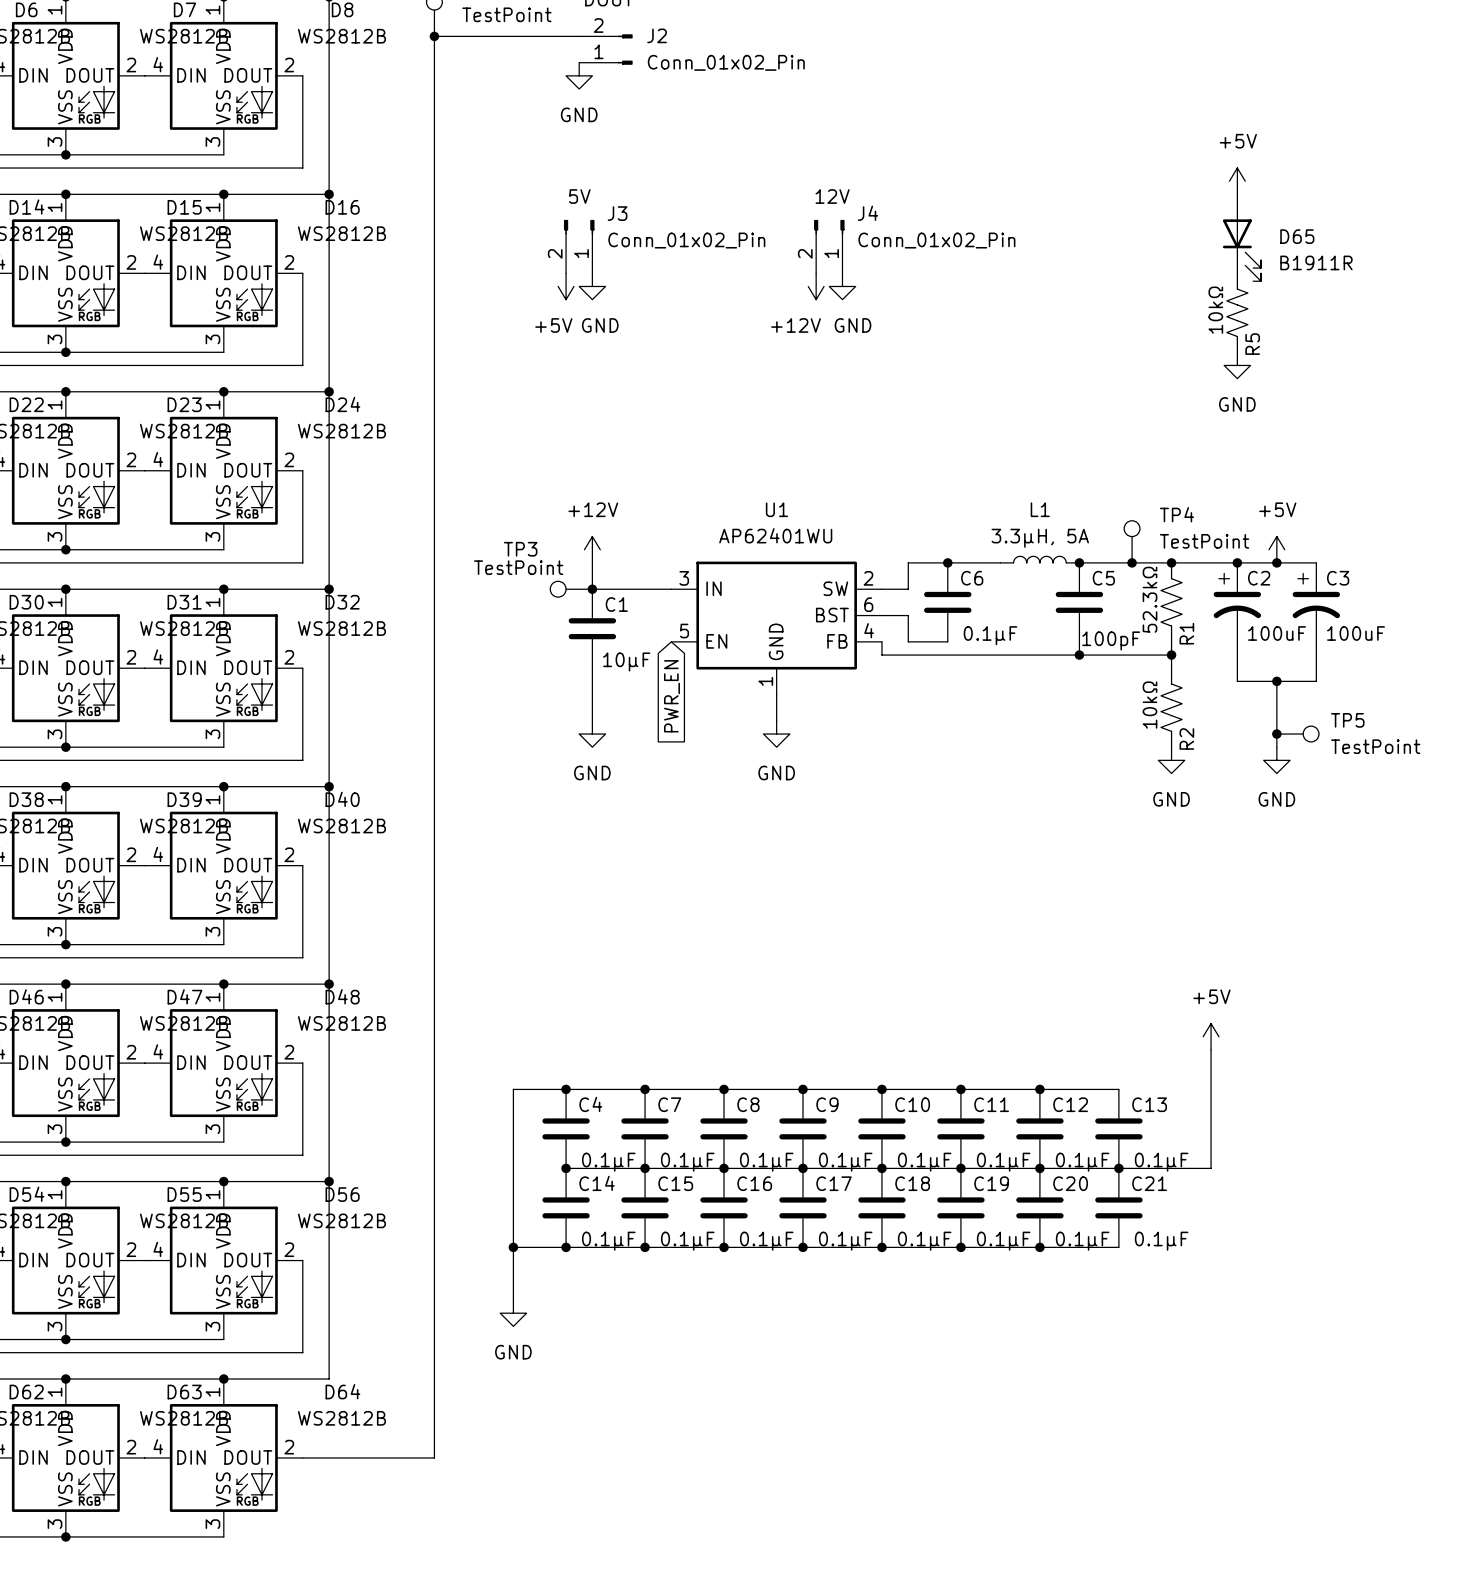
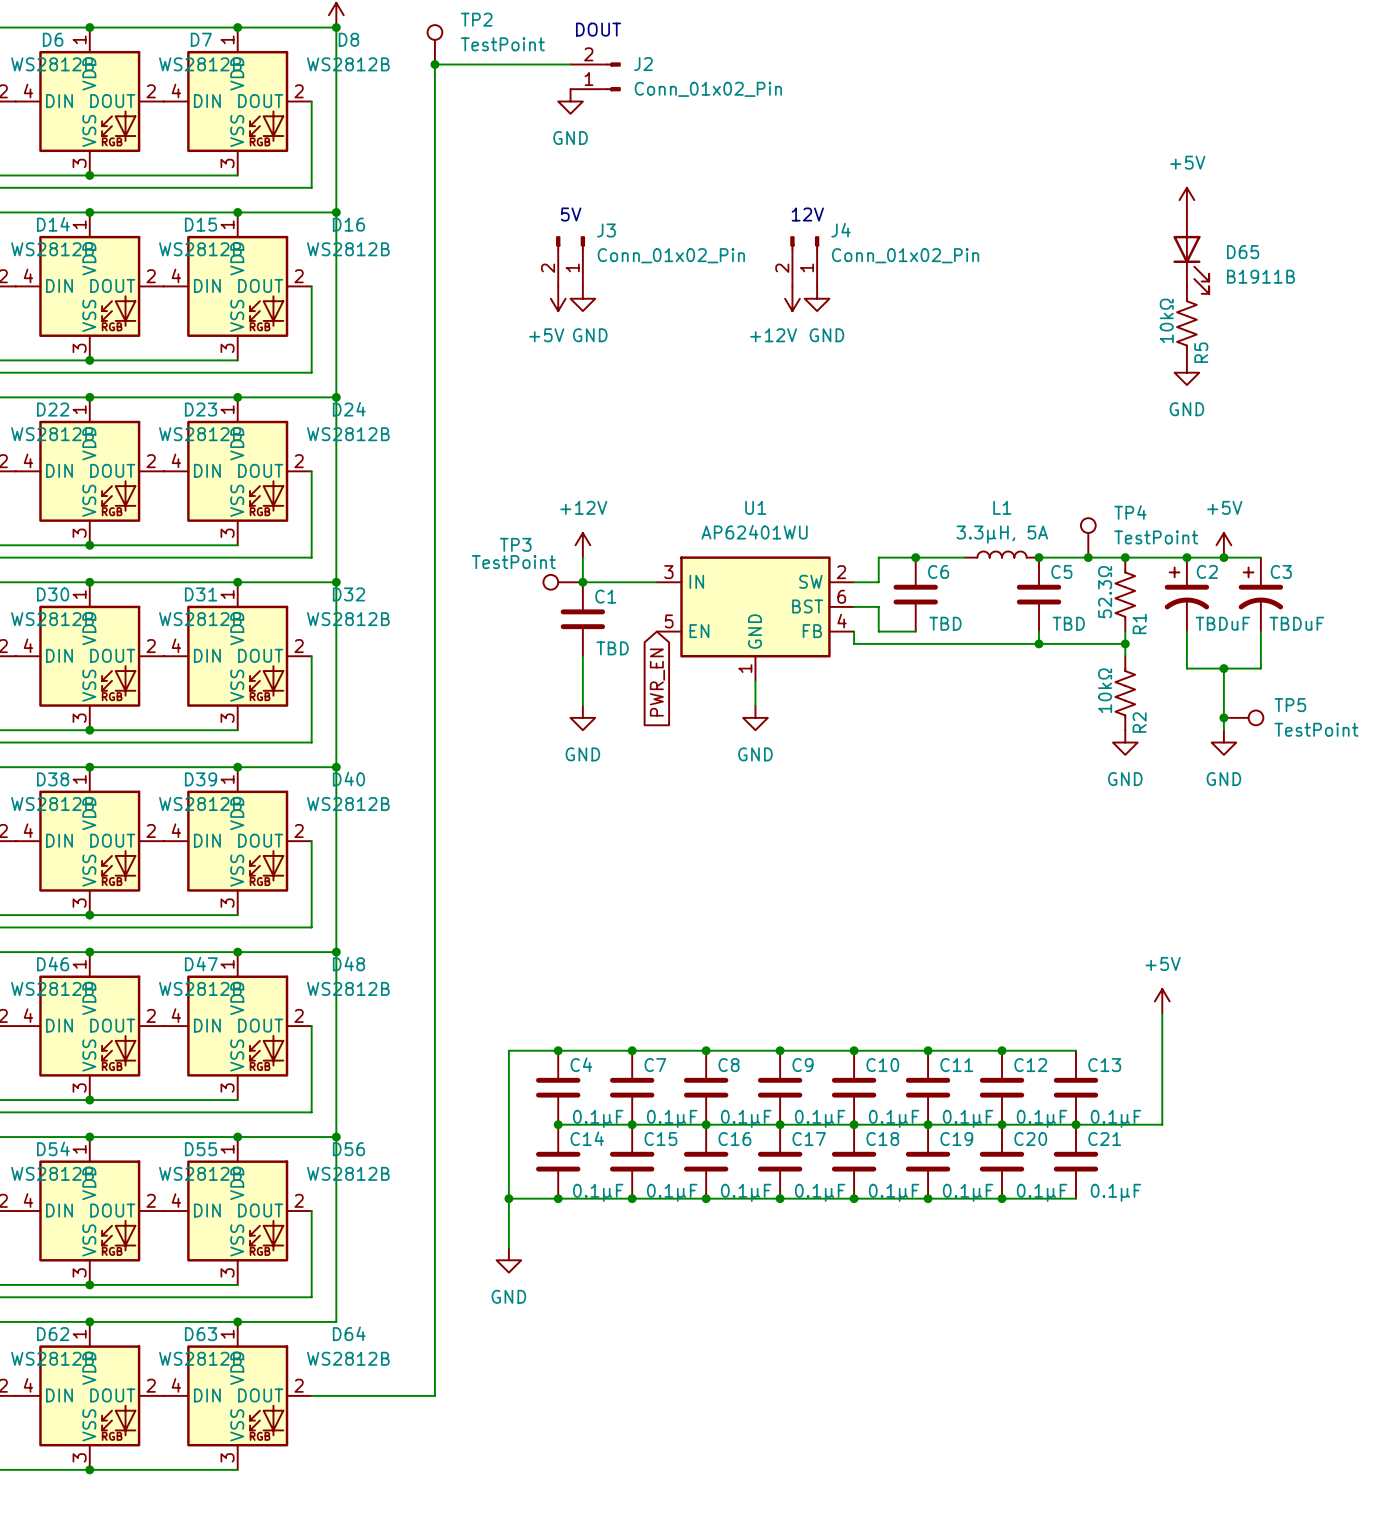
D65 value: B1911R (1316, 262) -> B1911B (1260, 276)
R1 value: 52.3kΩ (1150, 599) -> 52.3Ω (1105, 592)
C2 value: 100uF (1277, 633) -> TBDuF (1222, 623)
C3 value: 100uF (1356, 633) -> TBDuF (1296, 623)
C6 value: 0.1μF (990, 635) -> TBD (945, 623)
C5 value: 100pF (1111, 640) -> TBD (1068, 623)
C1 value: 10μF (626, 662) -> TBD (612, 648)

